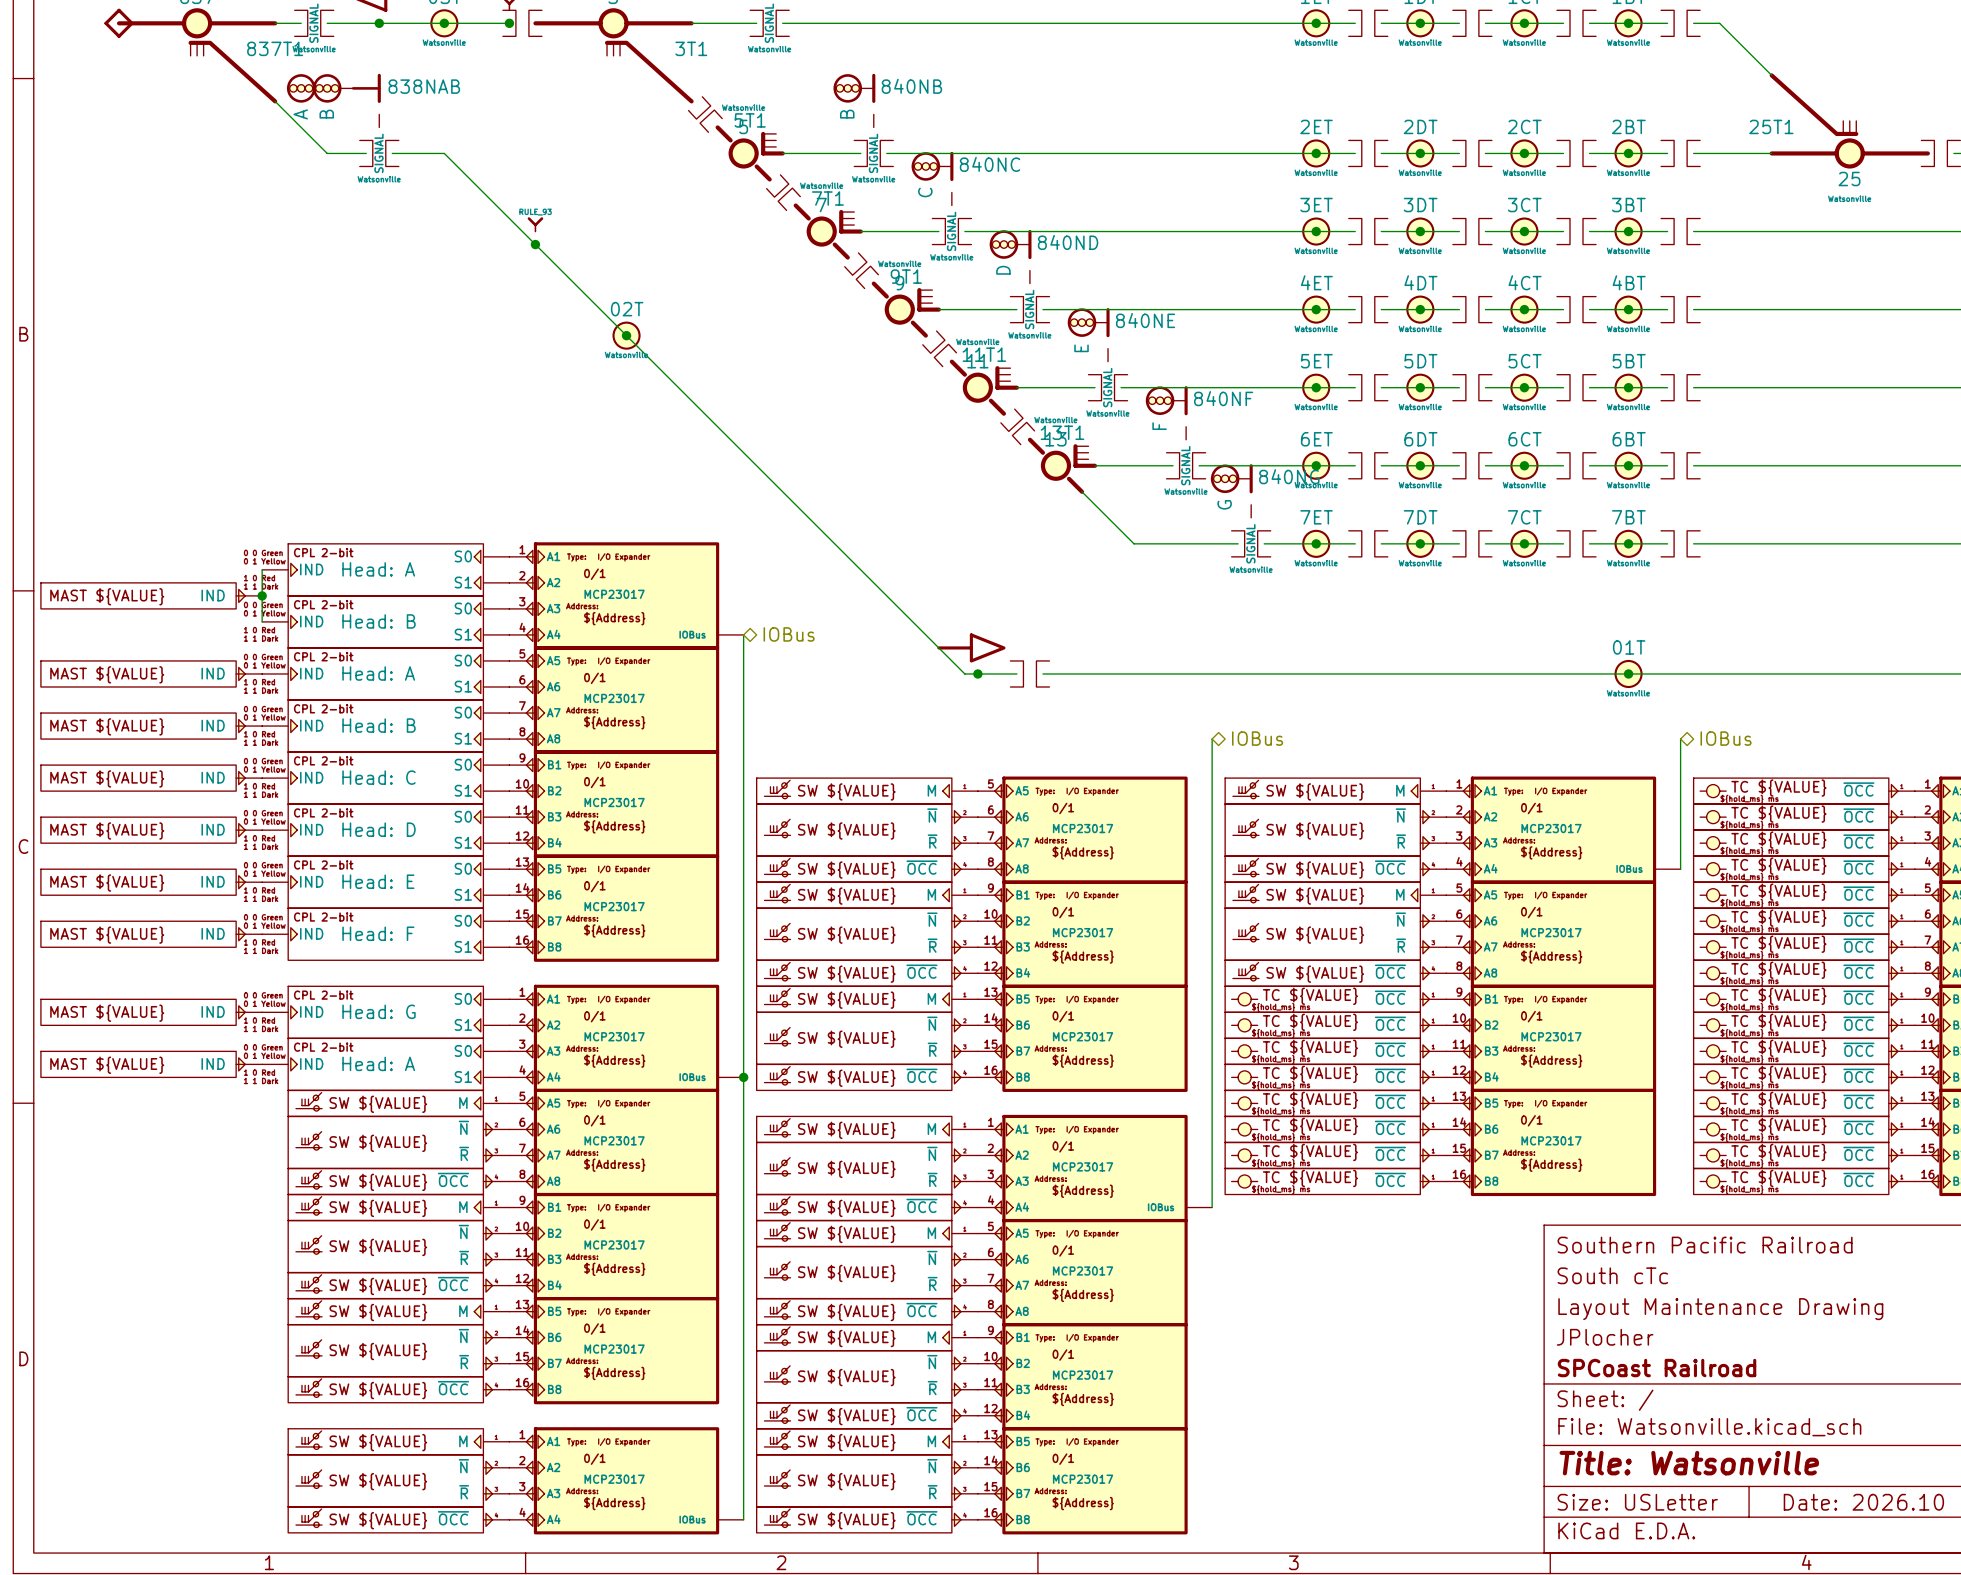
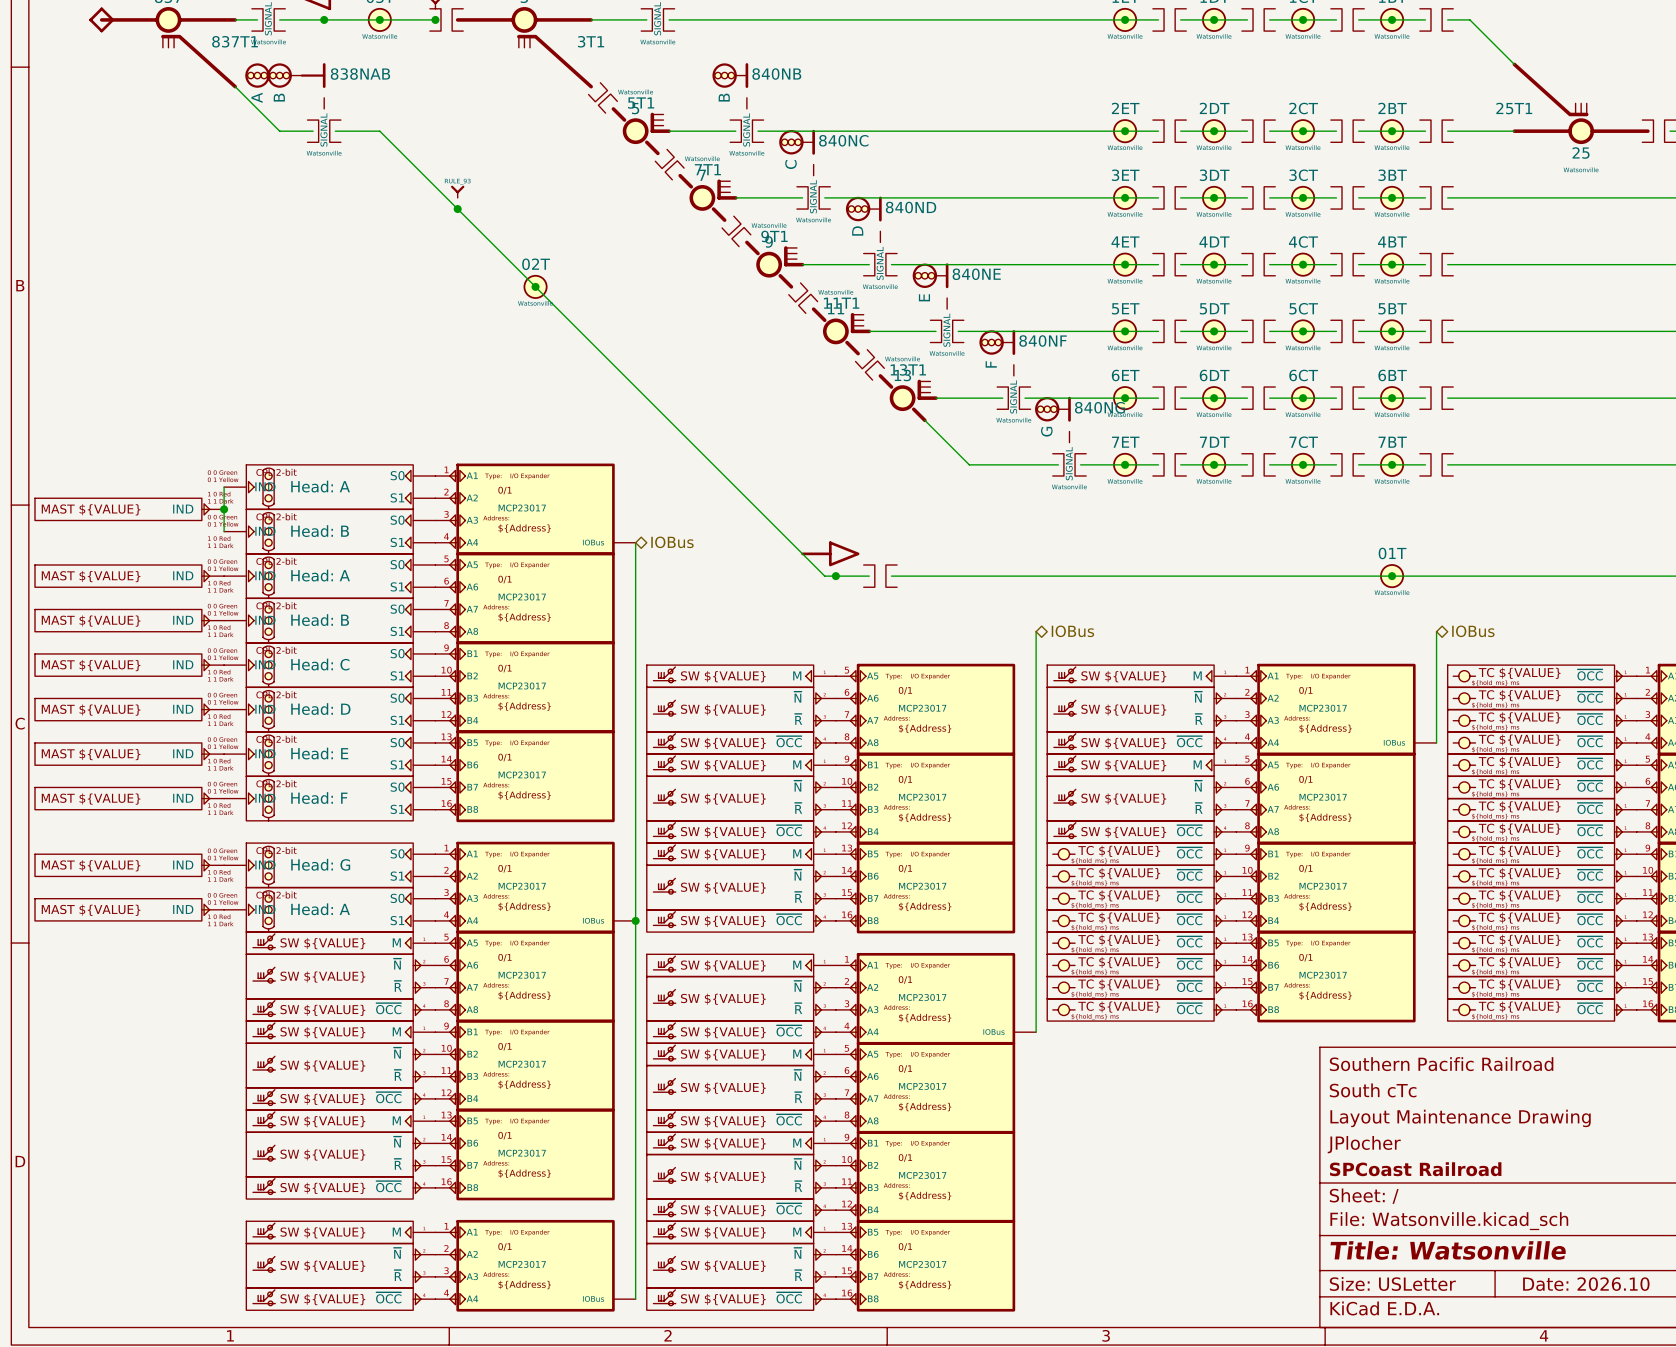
part symbol: [262, 543, 510, 596] -> [224, 464, 436, 510]
part symbol: [262, 595, 510, 648] -> [224, 509, 436, 554]
part symbol: [262, 647, 510, 701] -> [224, 553, 436, 599]
part symbol: [262, 700, 510, 753] -> [224, 598, 436, 643]
part symbol: [262, 752, 510, 805] -> [224, 642, 436, 688]
part symbol: [262, 804, 510, 857] -> [224, 687, 436, 732]
part symbol: [262, 856, 510, 909] -> [224, 731, 436, 777]
part symbol: [262, 908, 510, 961] -> [224, 776, 436, 821]
part symbol: [262, 986, 510, 1039] -> [224, 843, 436, 888]
part symbol: [262, 1038, 510, 1091] -> [224, 887, 436, 933]

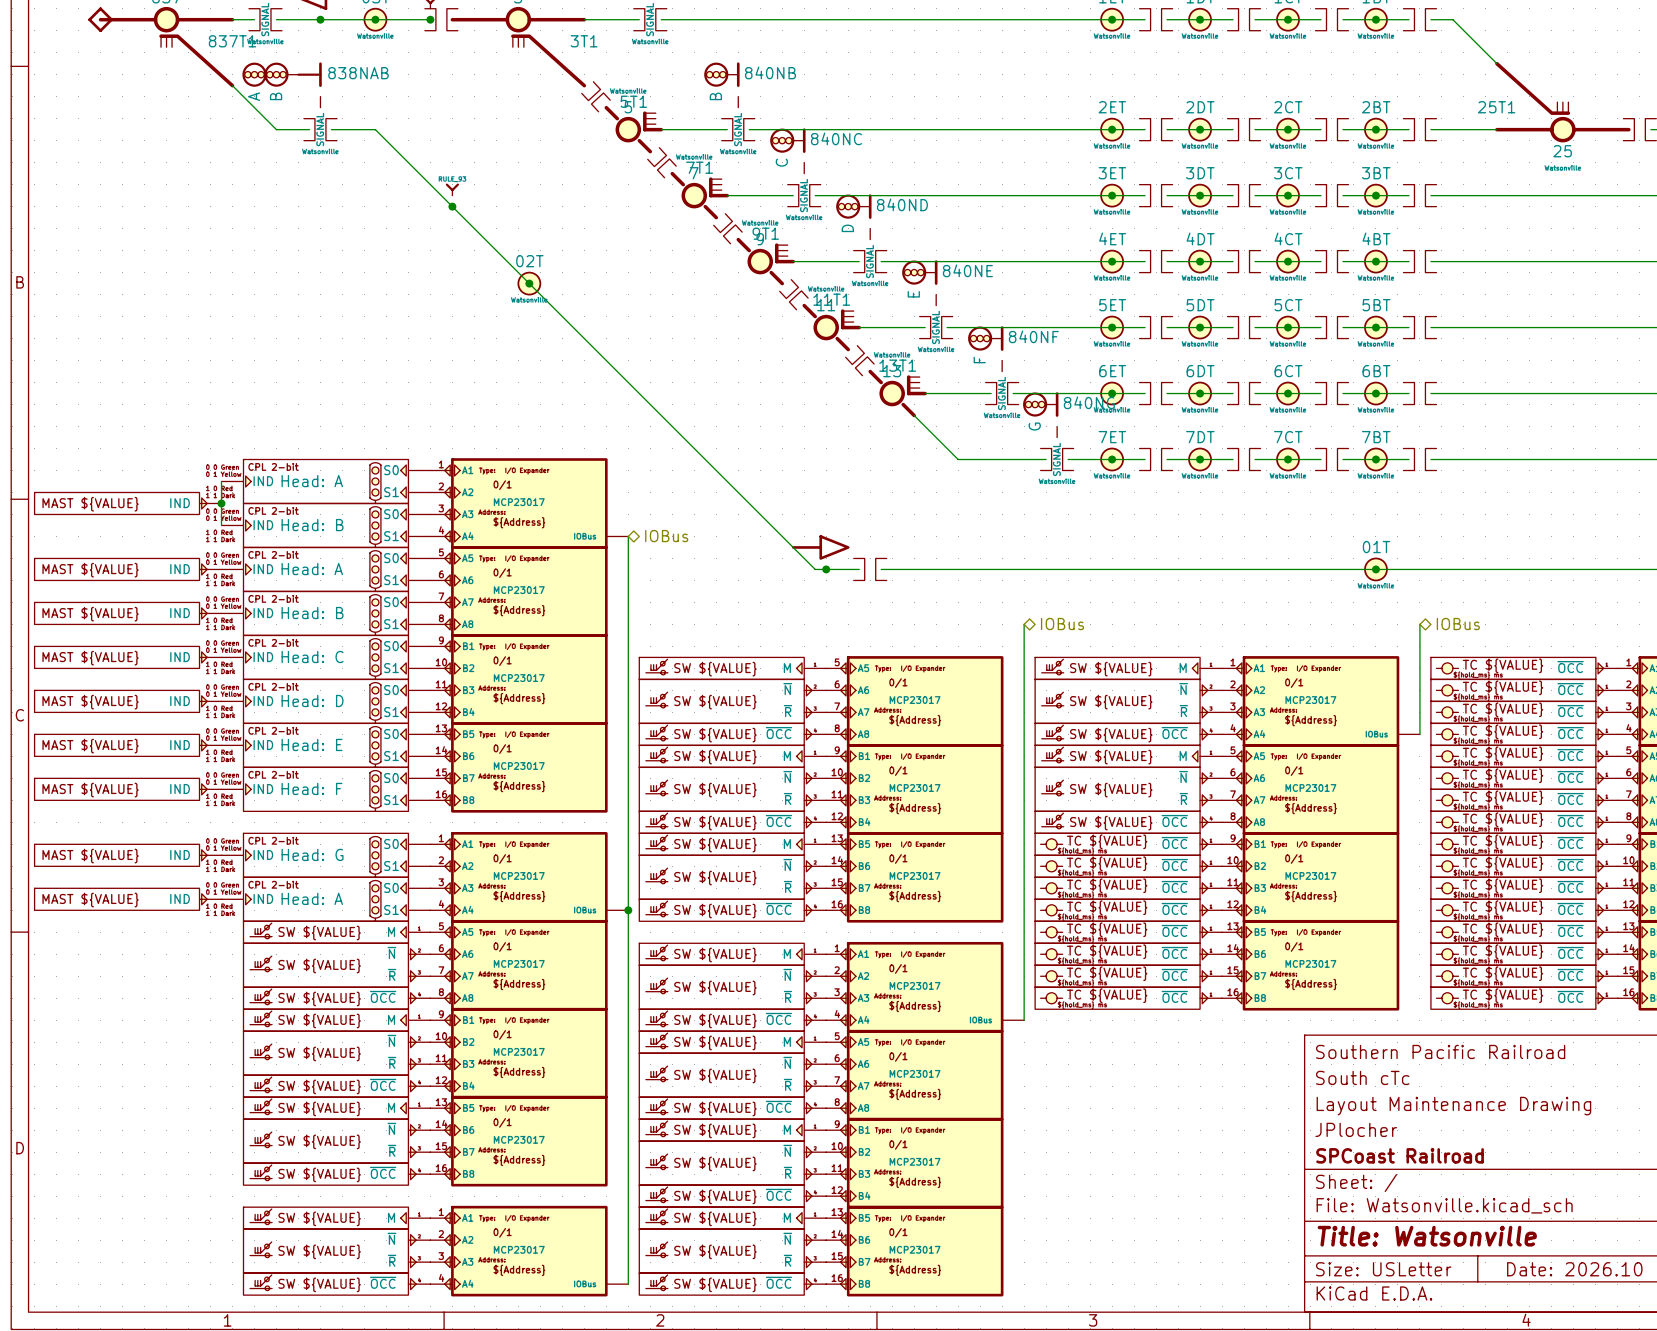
part symbol: [224, 464, 436, 510] -> [221, 459, 431, 504]
part symbol: [224, 509, 436, 554] -> [221, 503, 431, 548]
part symbol: [224, 553, 436, 599] -> [221, 547, 431, 592]
part symbol: [224, 598, 436, 643] -> [221, 591, 431, 636]
part symbol: [224, 642, 436, 688] -> [221, 635, 431, 680]
part symbol: [224, 687, 436, 732] -> [221, 679, 431, 724]
part symbol: [224, 731, 436, 777] -> [221, 723, 431, 768]
part symbol: [224, 776, 436, 821] -> [221, 767, 431, 812]
part symbol: [224, 843, 436, 888] -> [221, 833, 431, 878]
part symbol: [224, 887, 436, 933] -> [221, 877, 431, 922]

